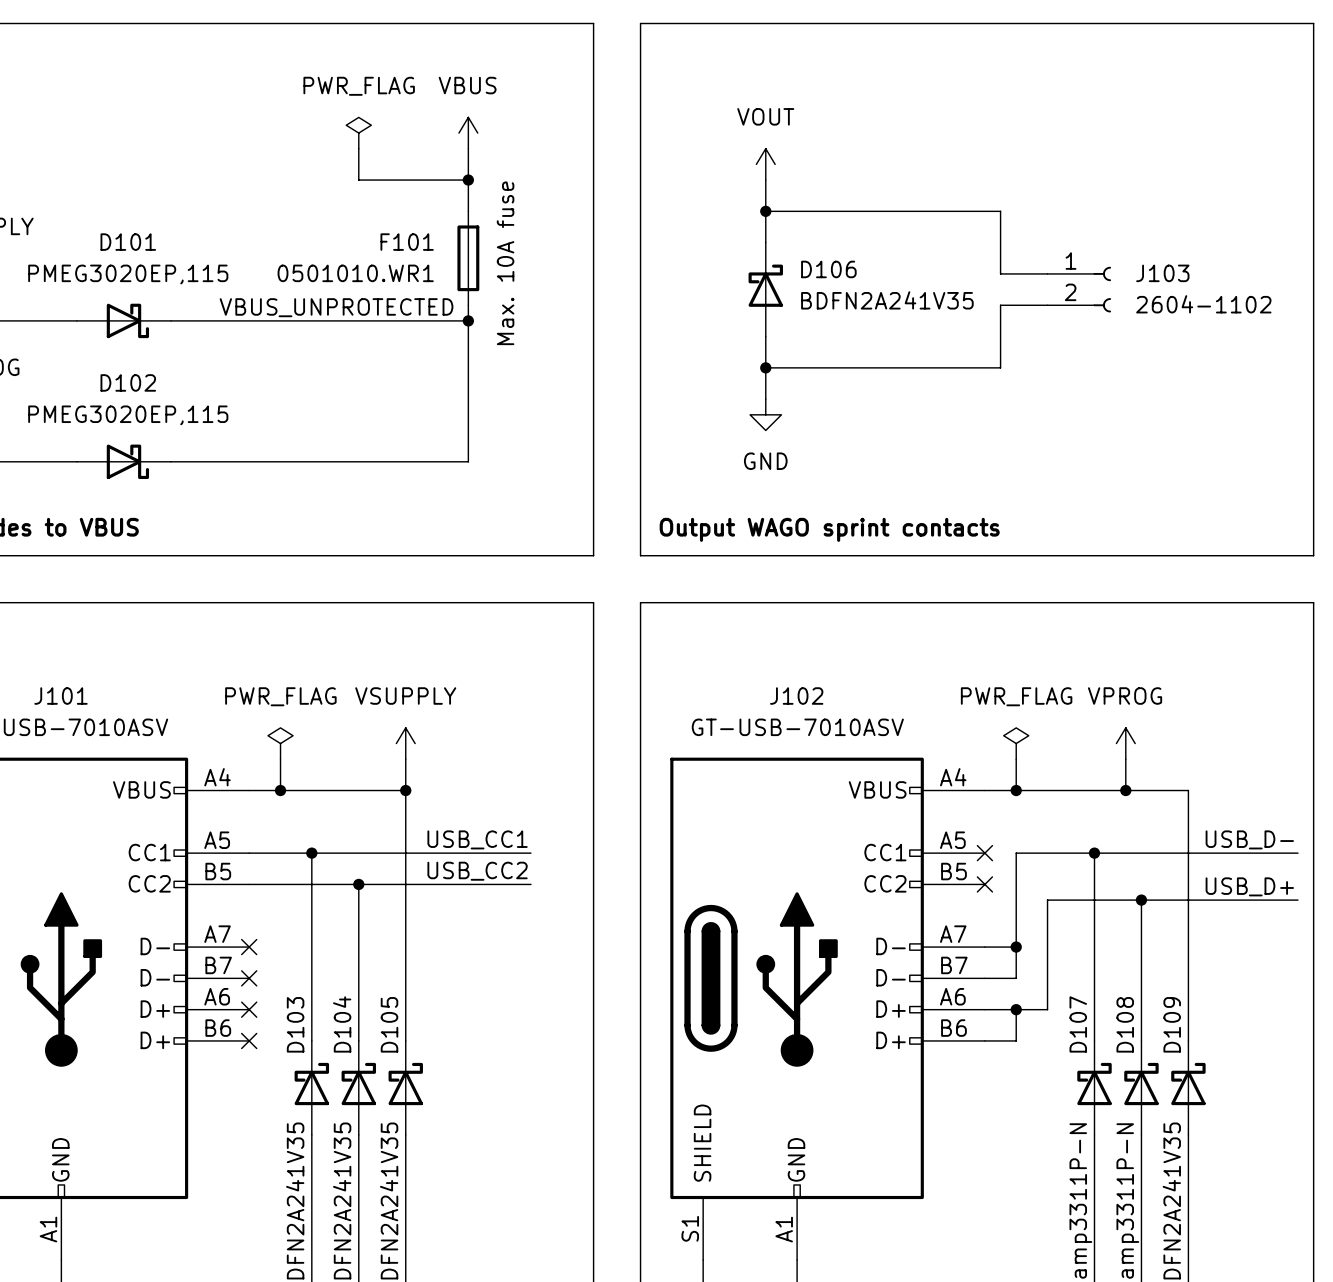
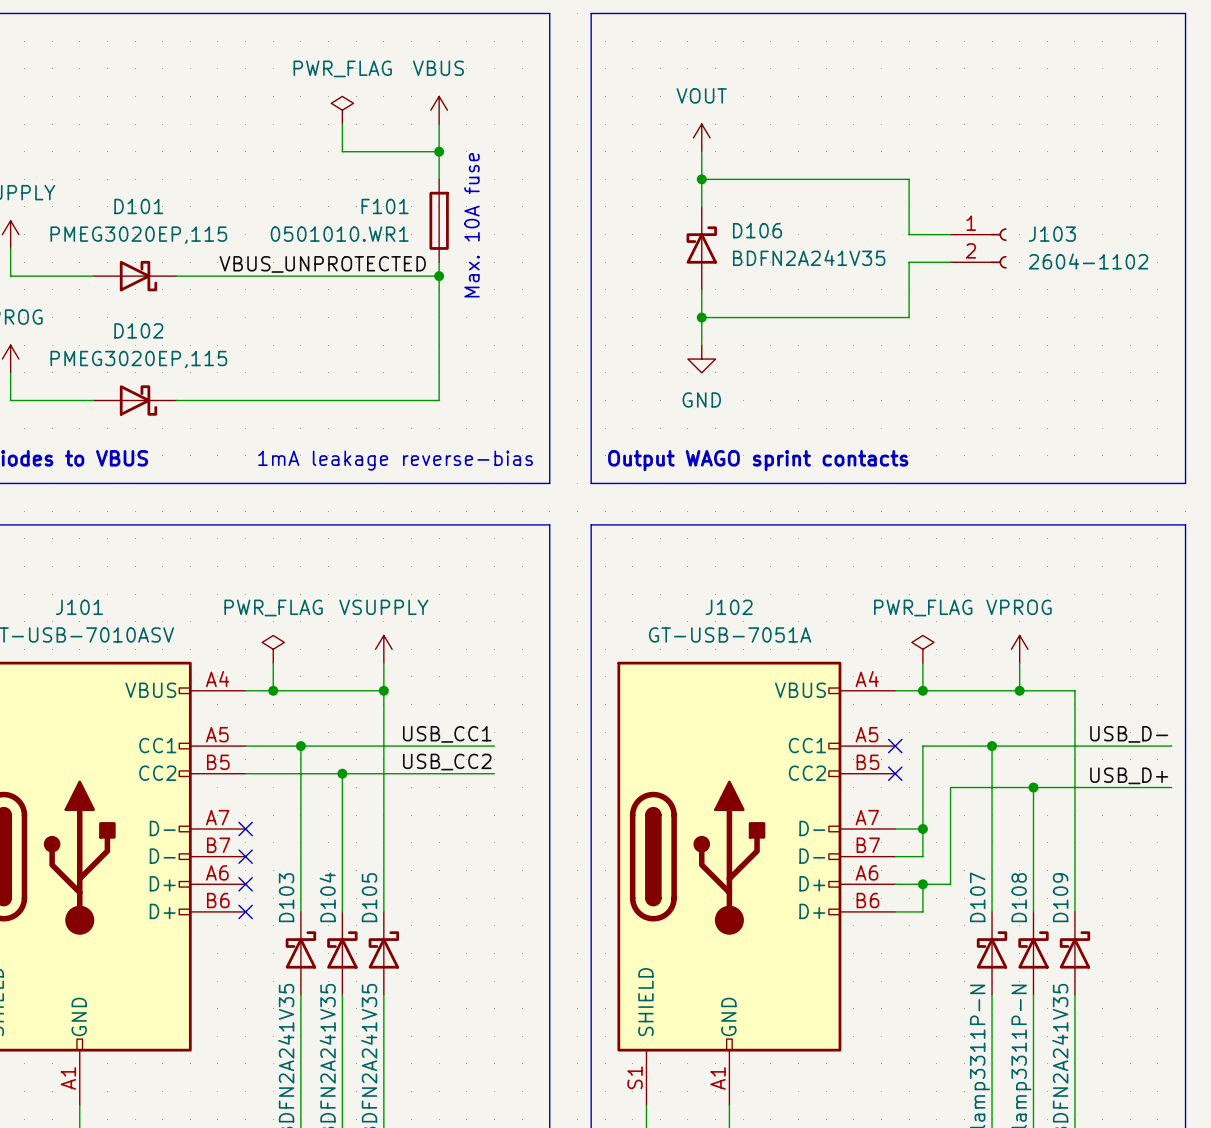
text: none -> 1mA leakage reverse-bias (395, 460)
J102 value: GT-USB-7010ASV (797, 727) -> GT-USB-7051A (730, 634)

